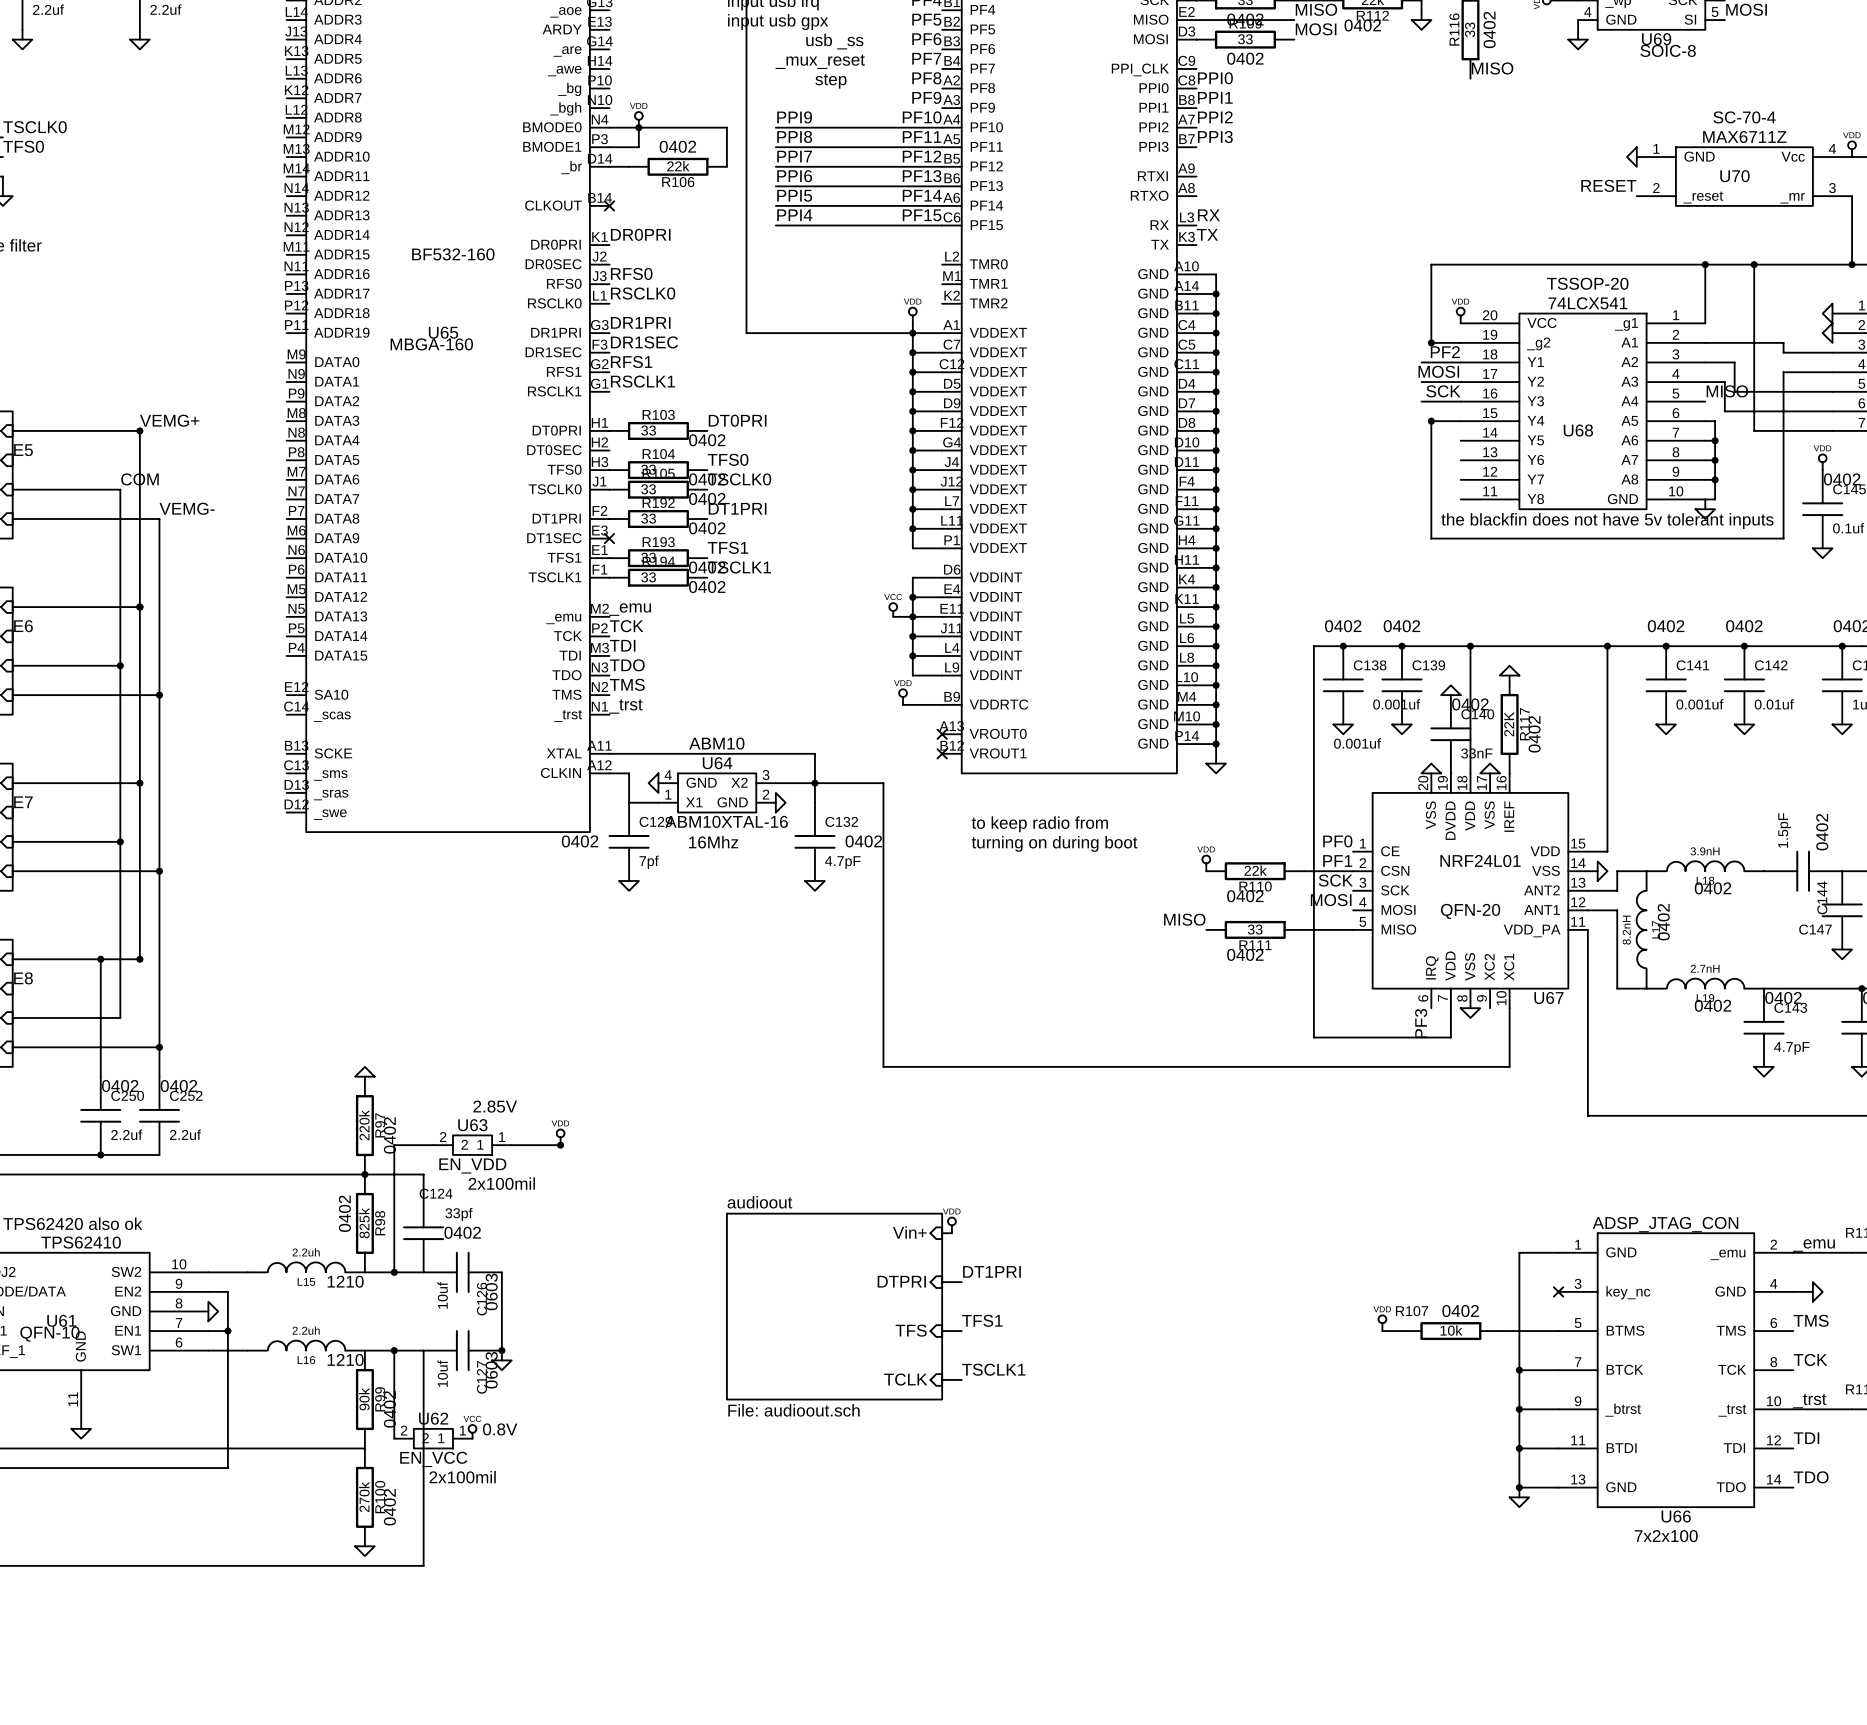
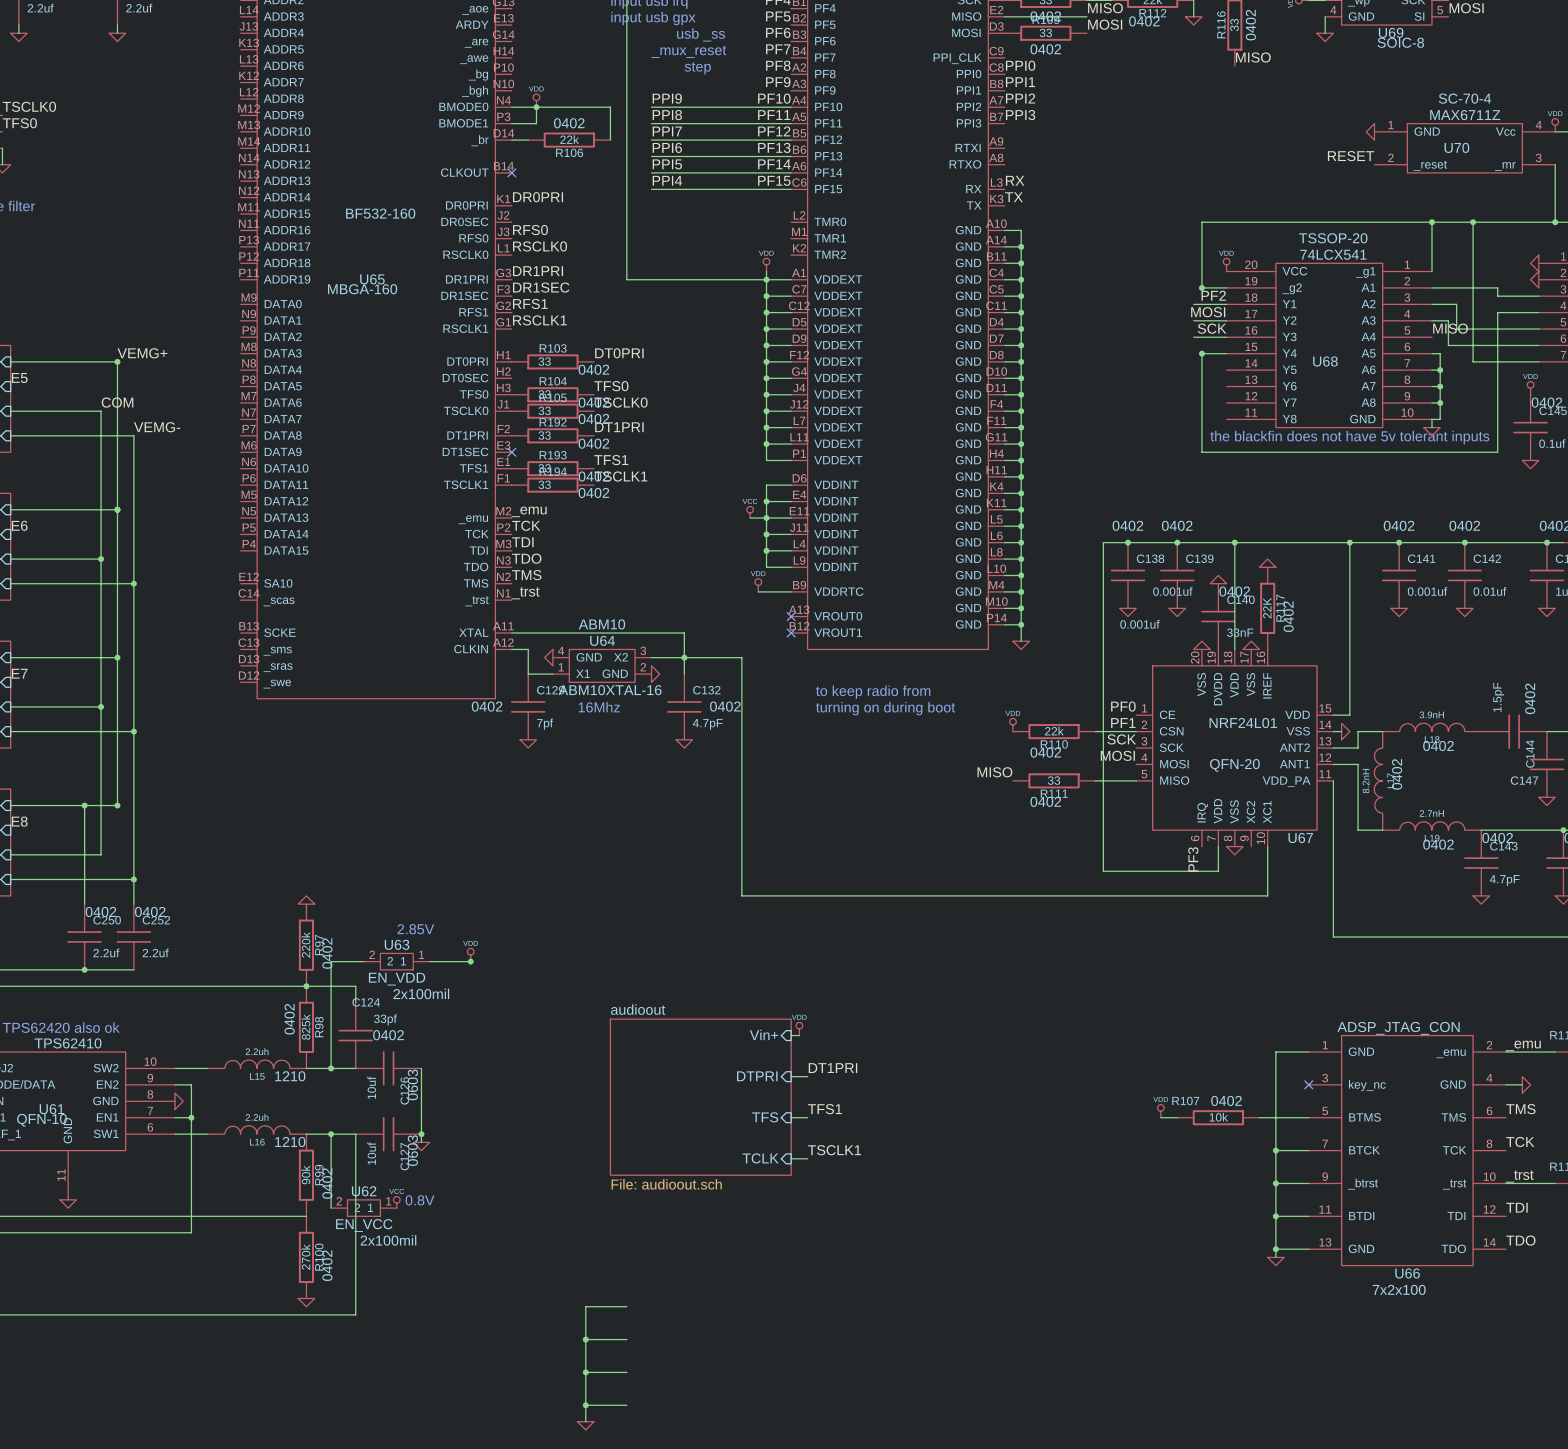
wire: none -> (626, 1306) (585, 1306) (585, 1421)
wire: none -> (585, 1339) (626, 1339)
junction: none -> (585, 1339)
wire: none -> (585, 1372) (626, 1372)
junction: none -> (585, 1372)
wire: none -> (585, 1405) (626, 1405)
junction: none -> (585, 1405)
power symbol: none -> (585, 1425)

